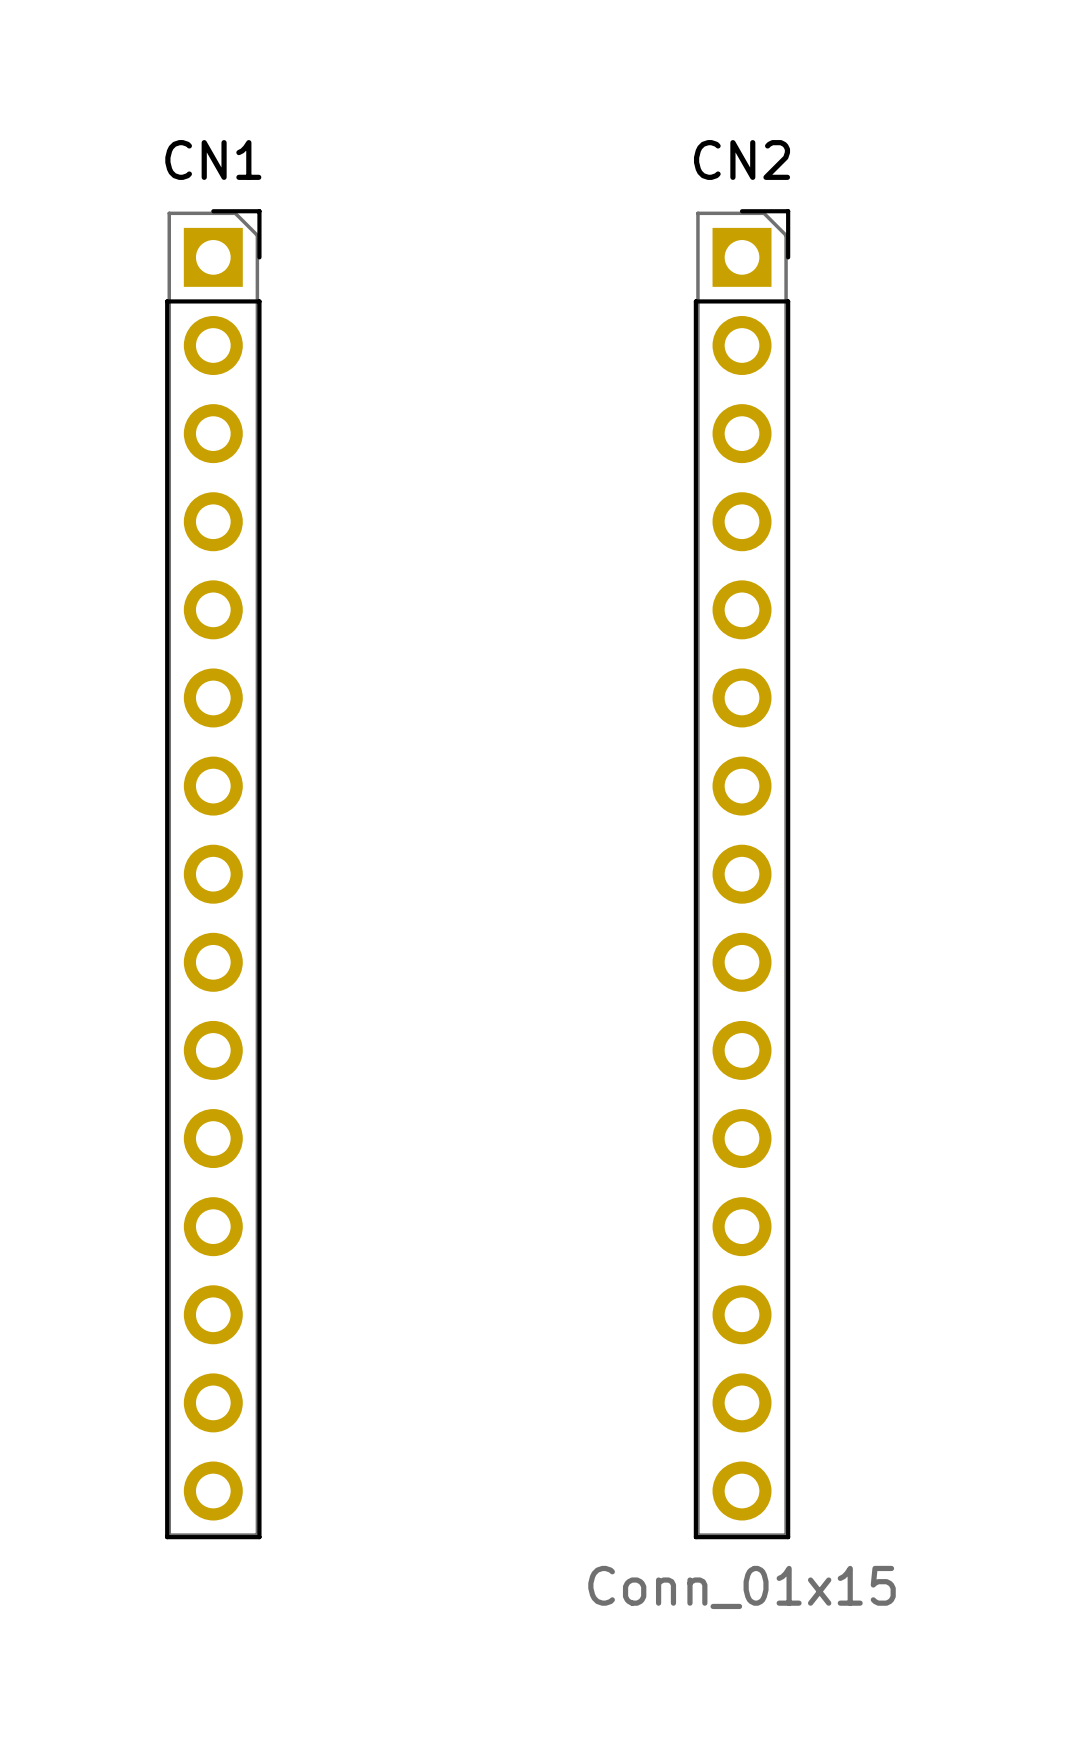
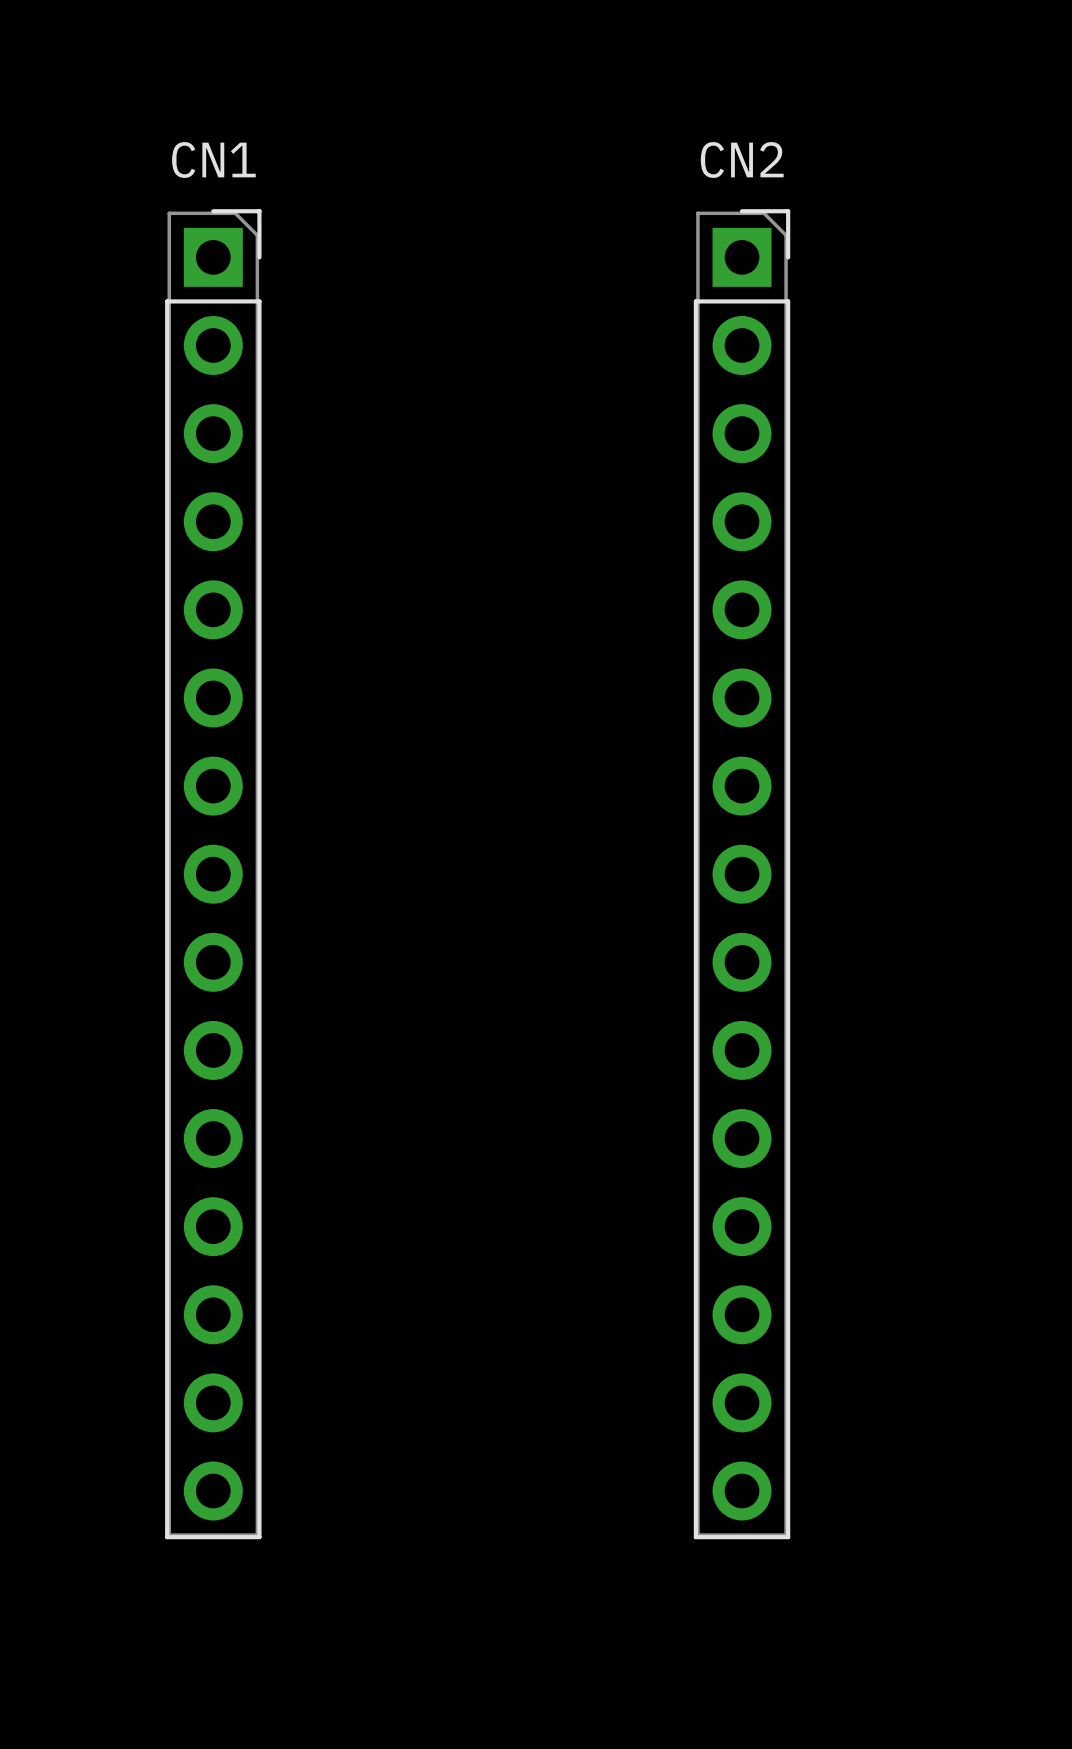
CN2 value: Conn_01x15 (742, 1587) -> none

